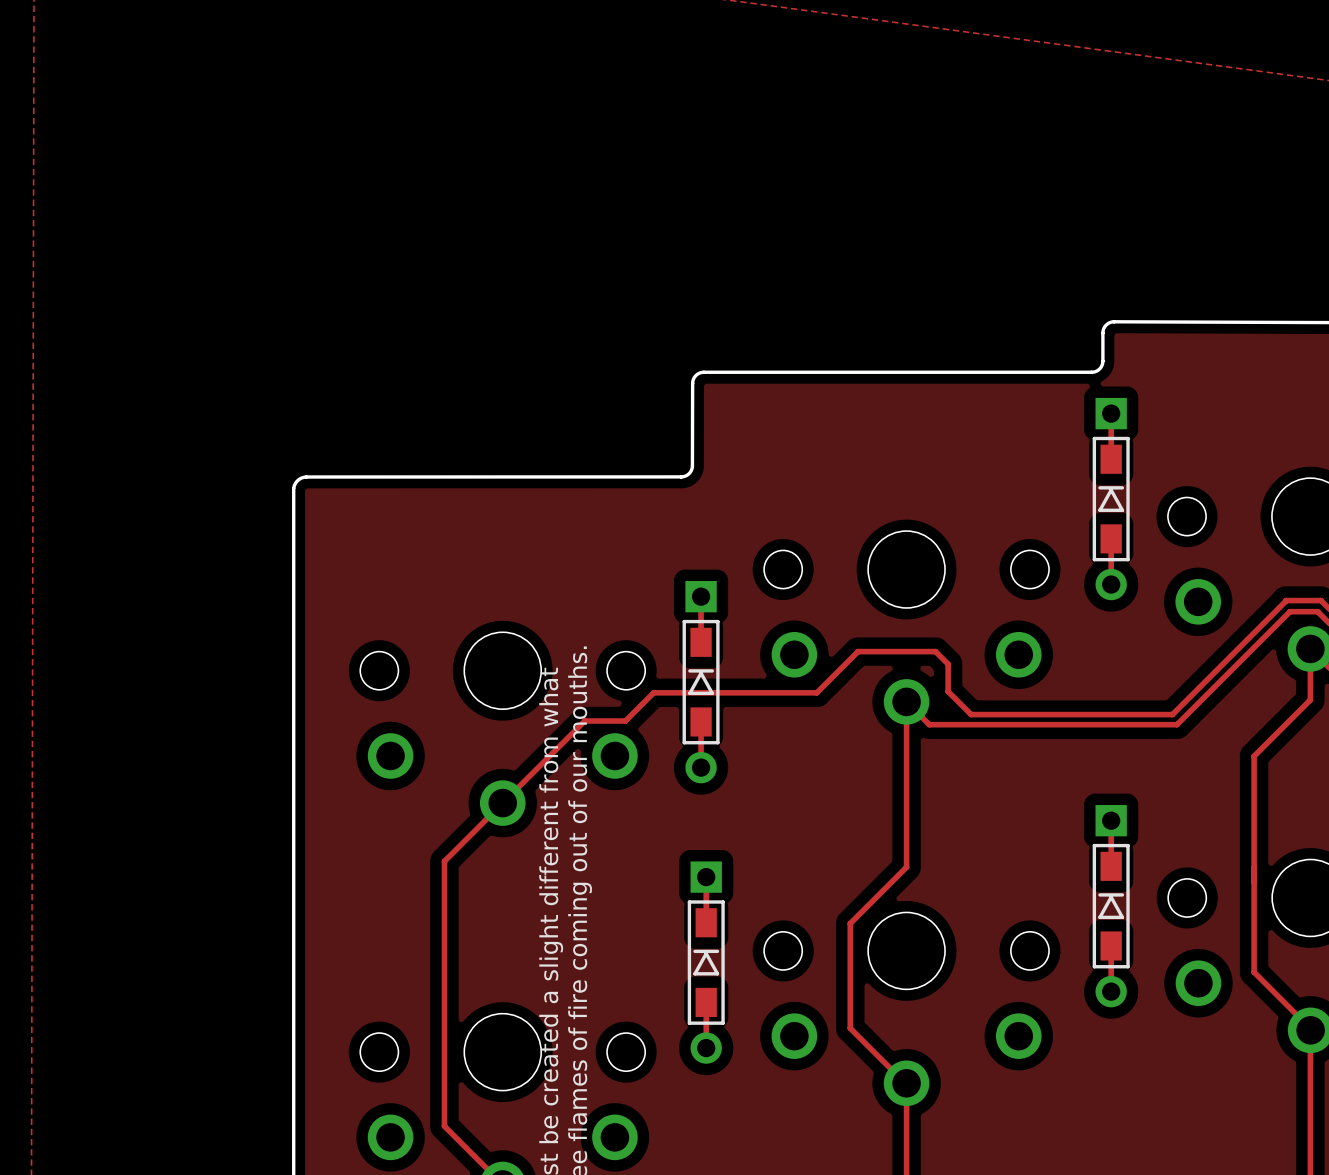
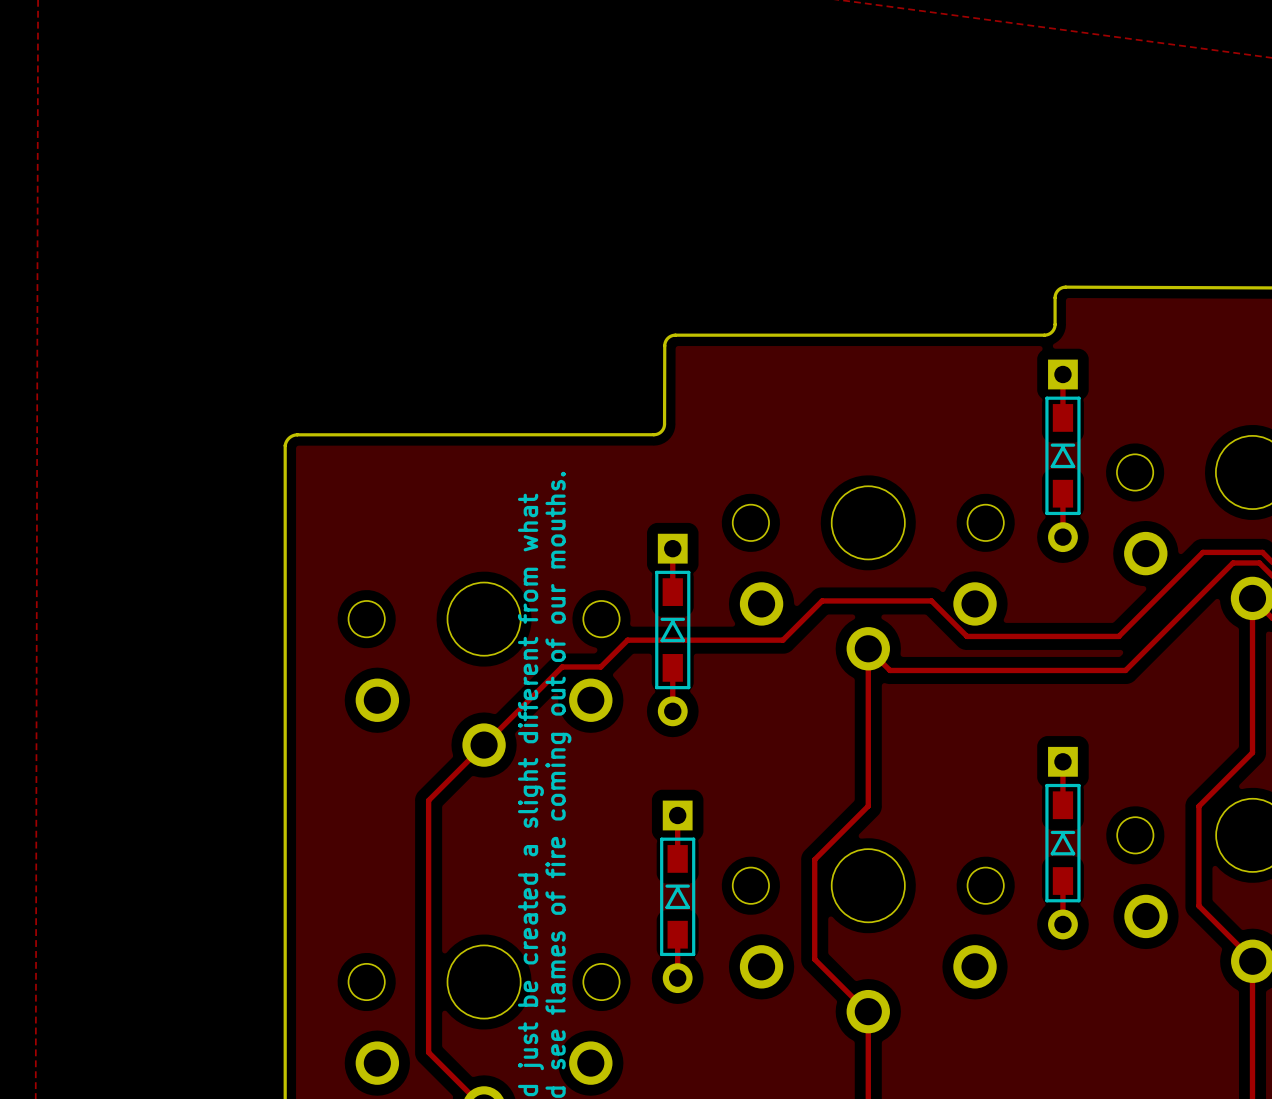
track: (1285, 600) (1172, 714) (971, 714) (948, 691) (948, 664) (935, 651) -> (1229, 552) (1202, 552) (1118, 636) (967, 636) (931, 600) (895, 600)
track: (1310, 699) (1254, 756) (1254, 867) -> (1252, 646) (1252, 752) (1198, 806)

